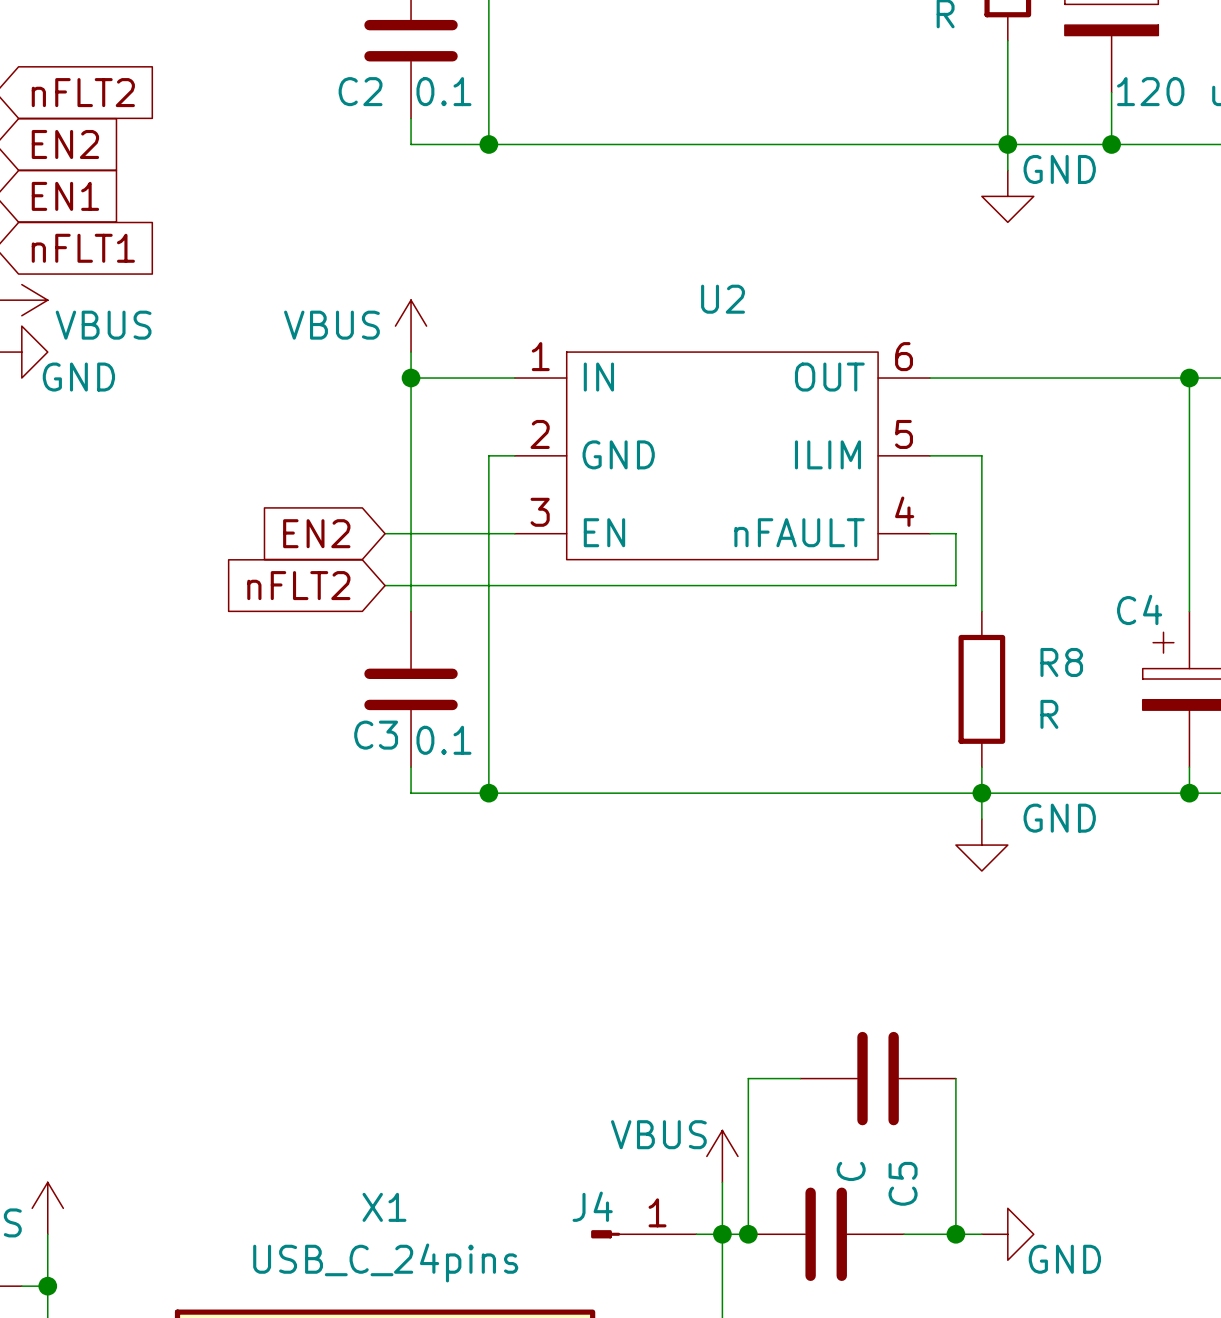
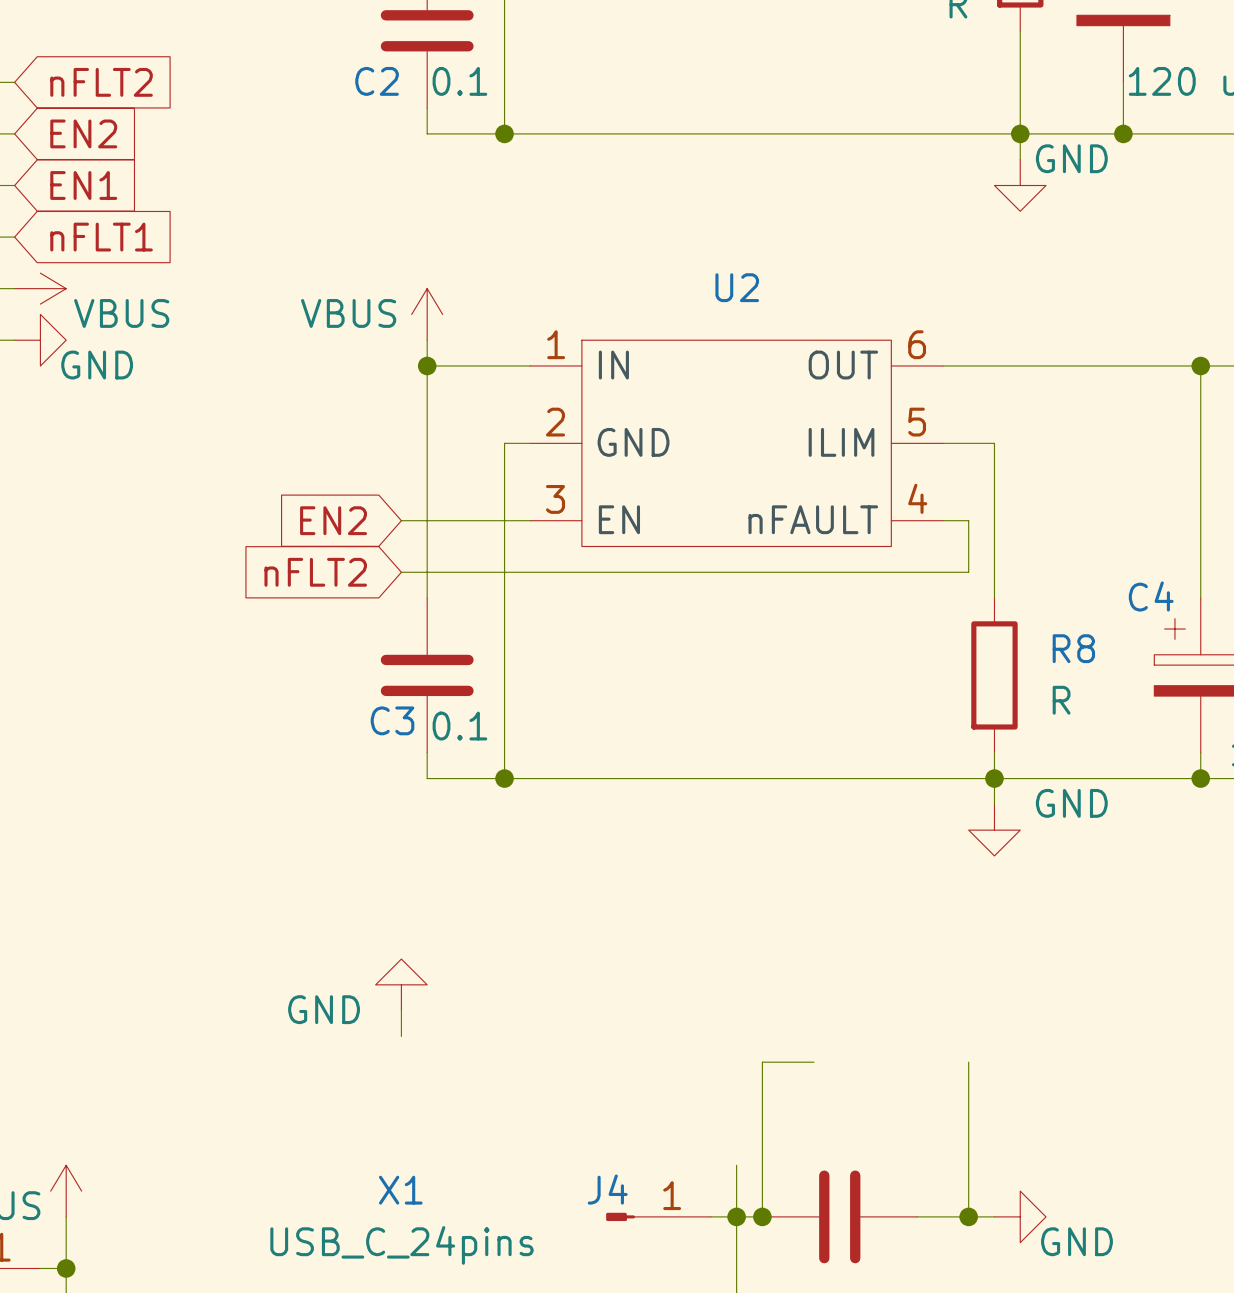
power symbol: none -> GND (401, 984)
wire: none -> (401, 1010) (401, 1036)
C5: C (878, 1078) -> none
power symbol: VBUS (722, 1156) -> none

